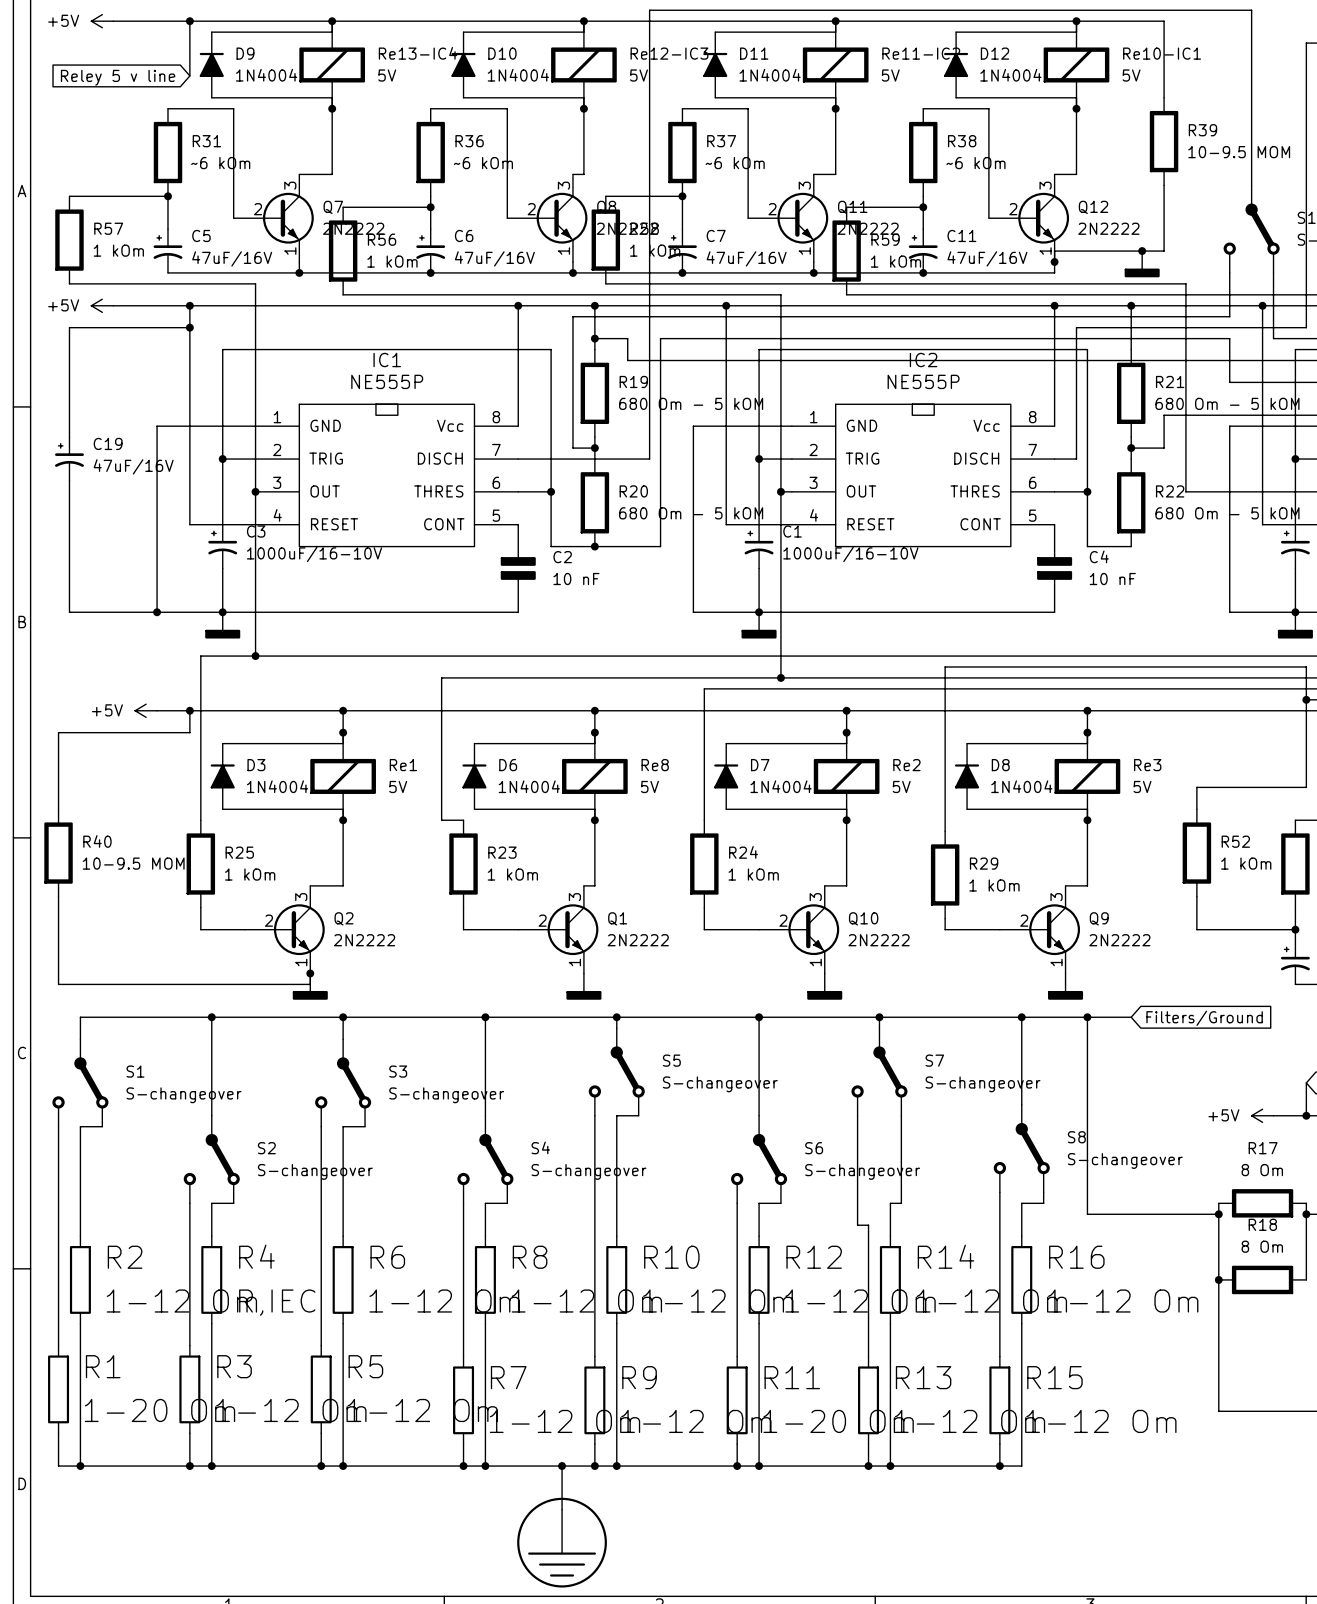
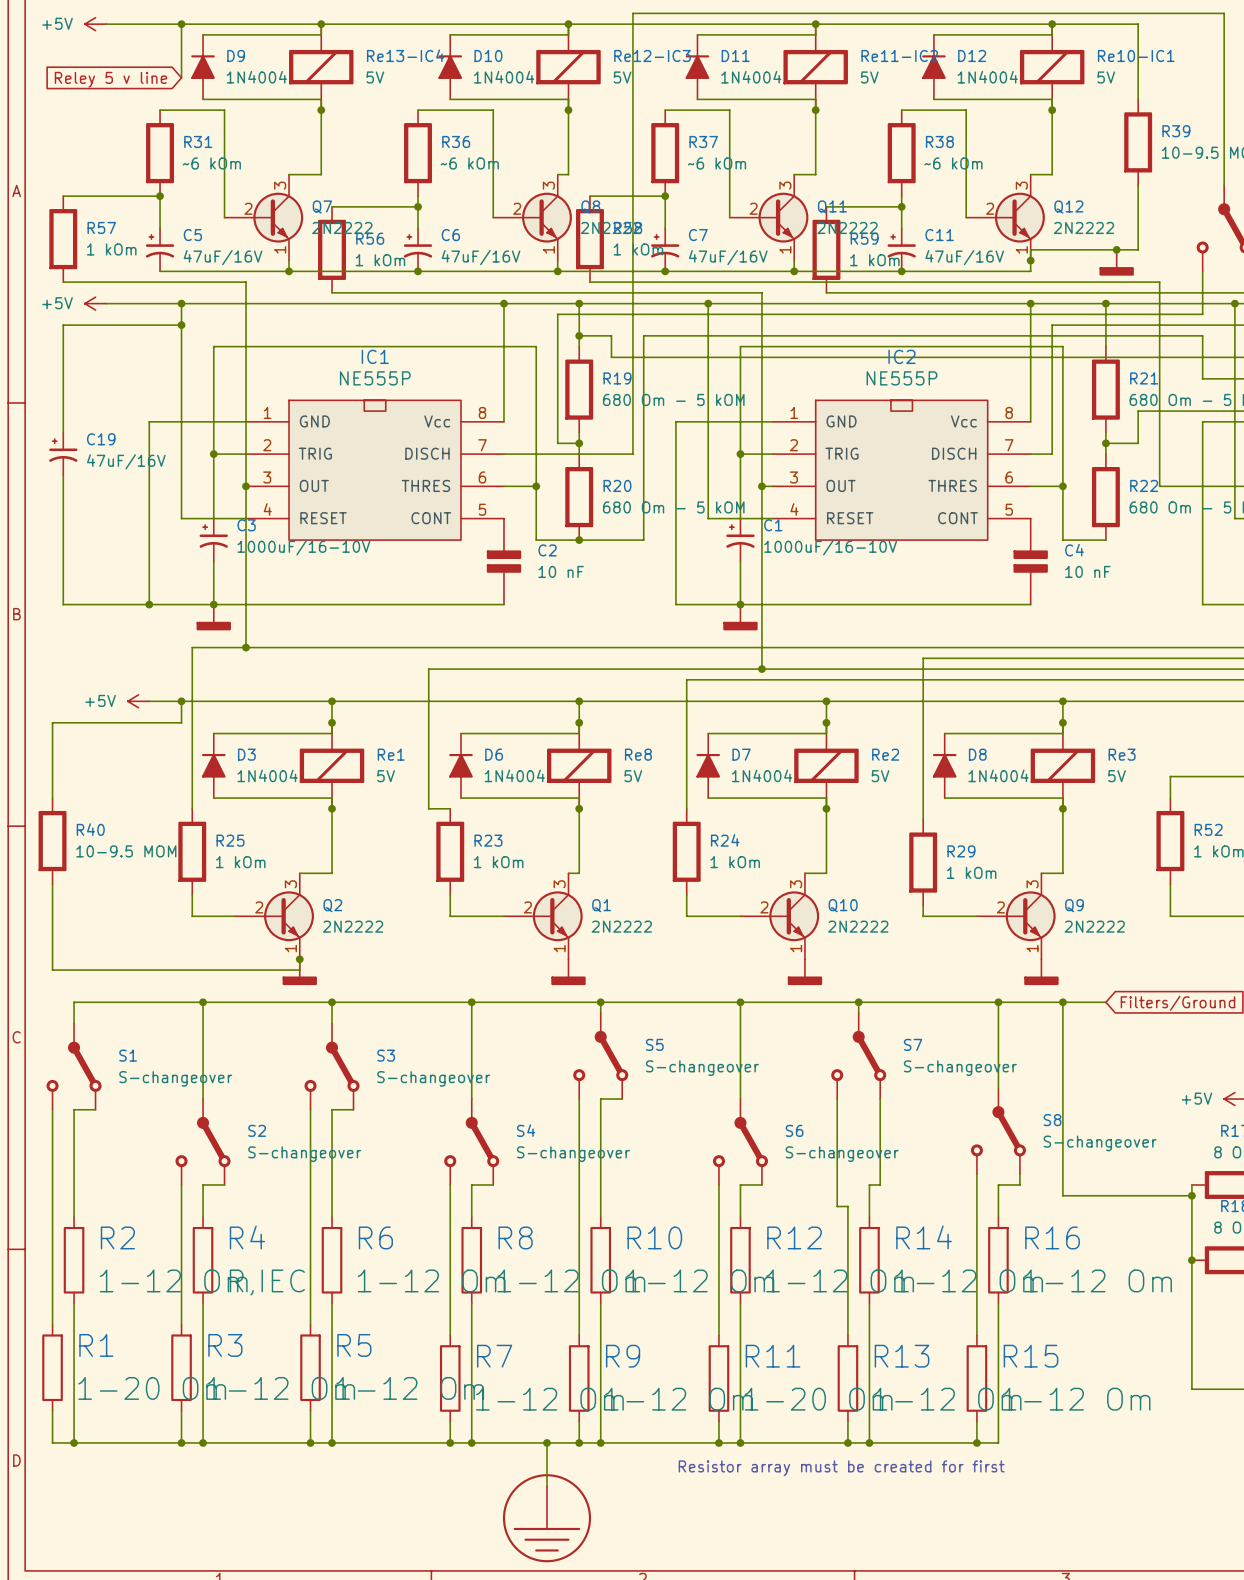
text: none -> Resistor array must be created for first (841, 1468)

